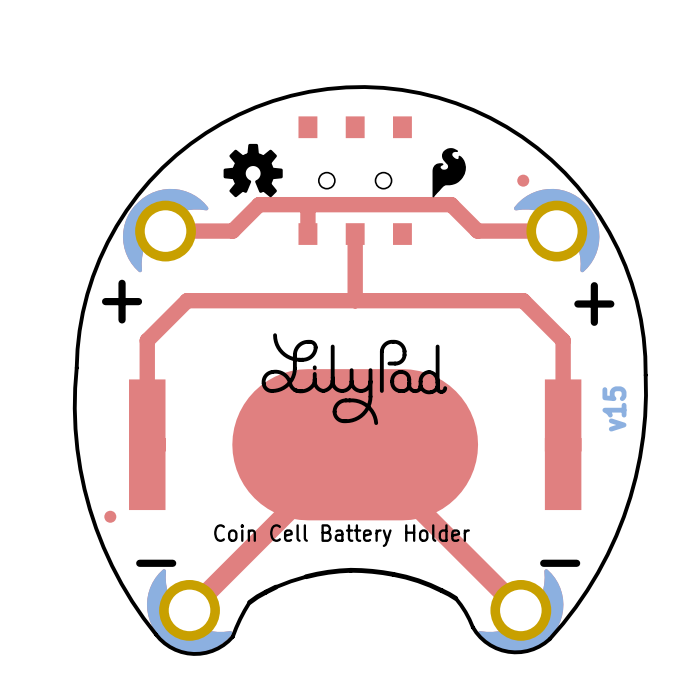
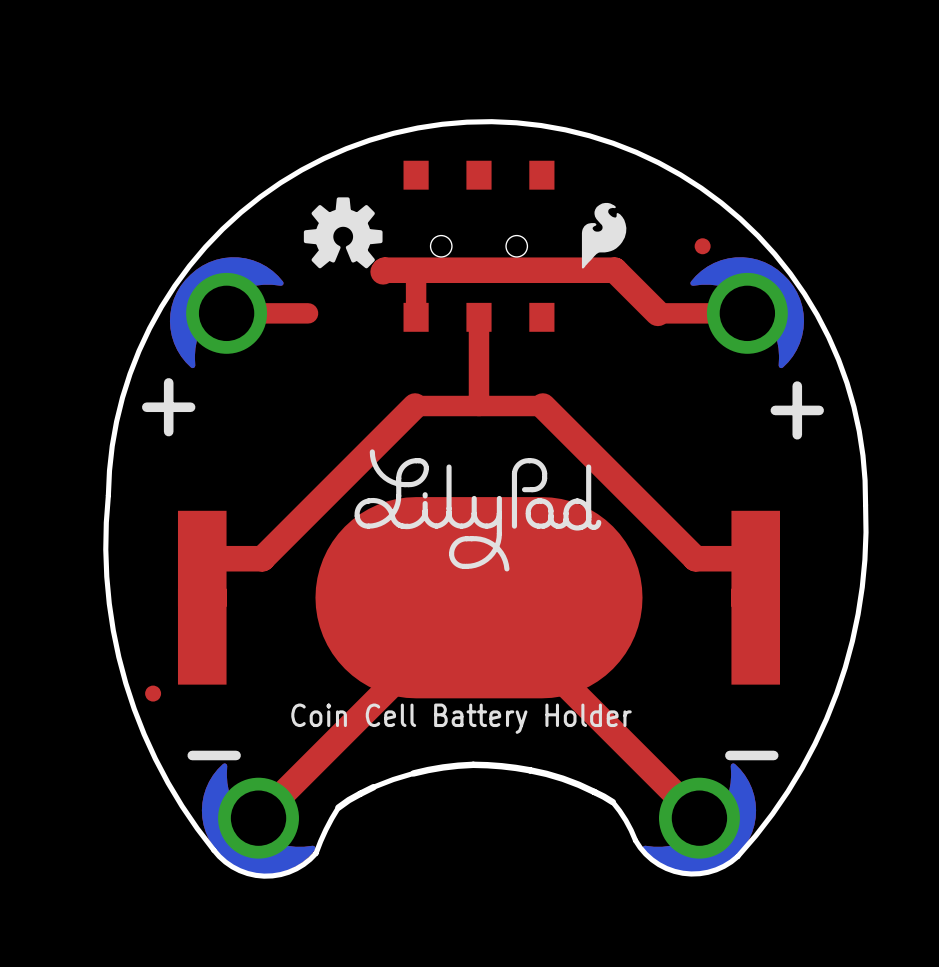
top track: (489, 231) (477, 231) (451, 204) (259, 204) (232, 231) (226, 231) -> (657, 313) (614, 270) (384, 270) (383, 271)
top track: (307, 300) (187, 300) (147, 340) (147, 415) -> (415, 406) (262, 558) (202, 558)
top track: (403, 300) (523, 300) (563, 340) (563, 415) -> (542, 406) (695, 558) (755, 558)
text: v15 (614, 408) -> none

